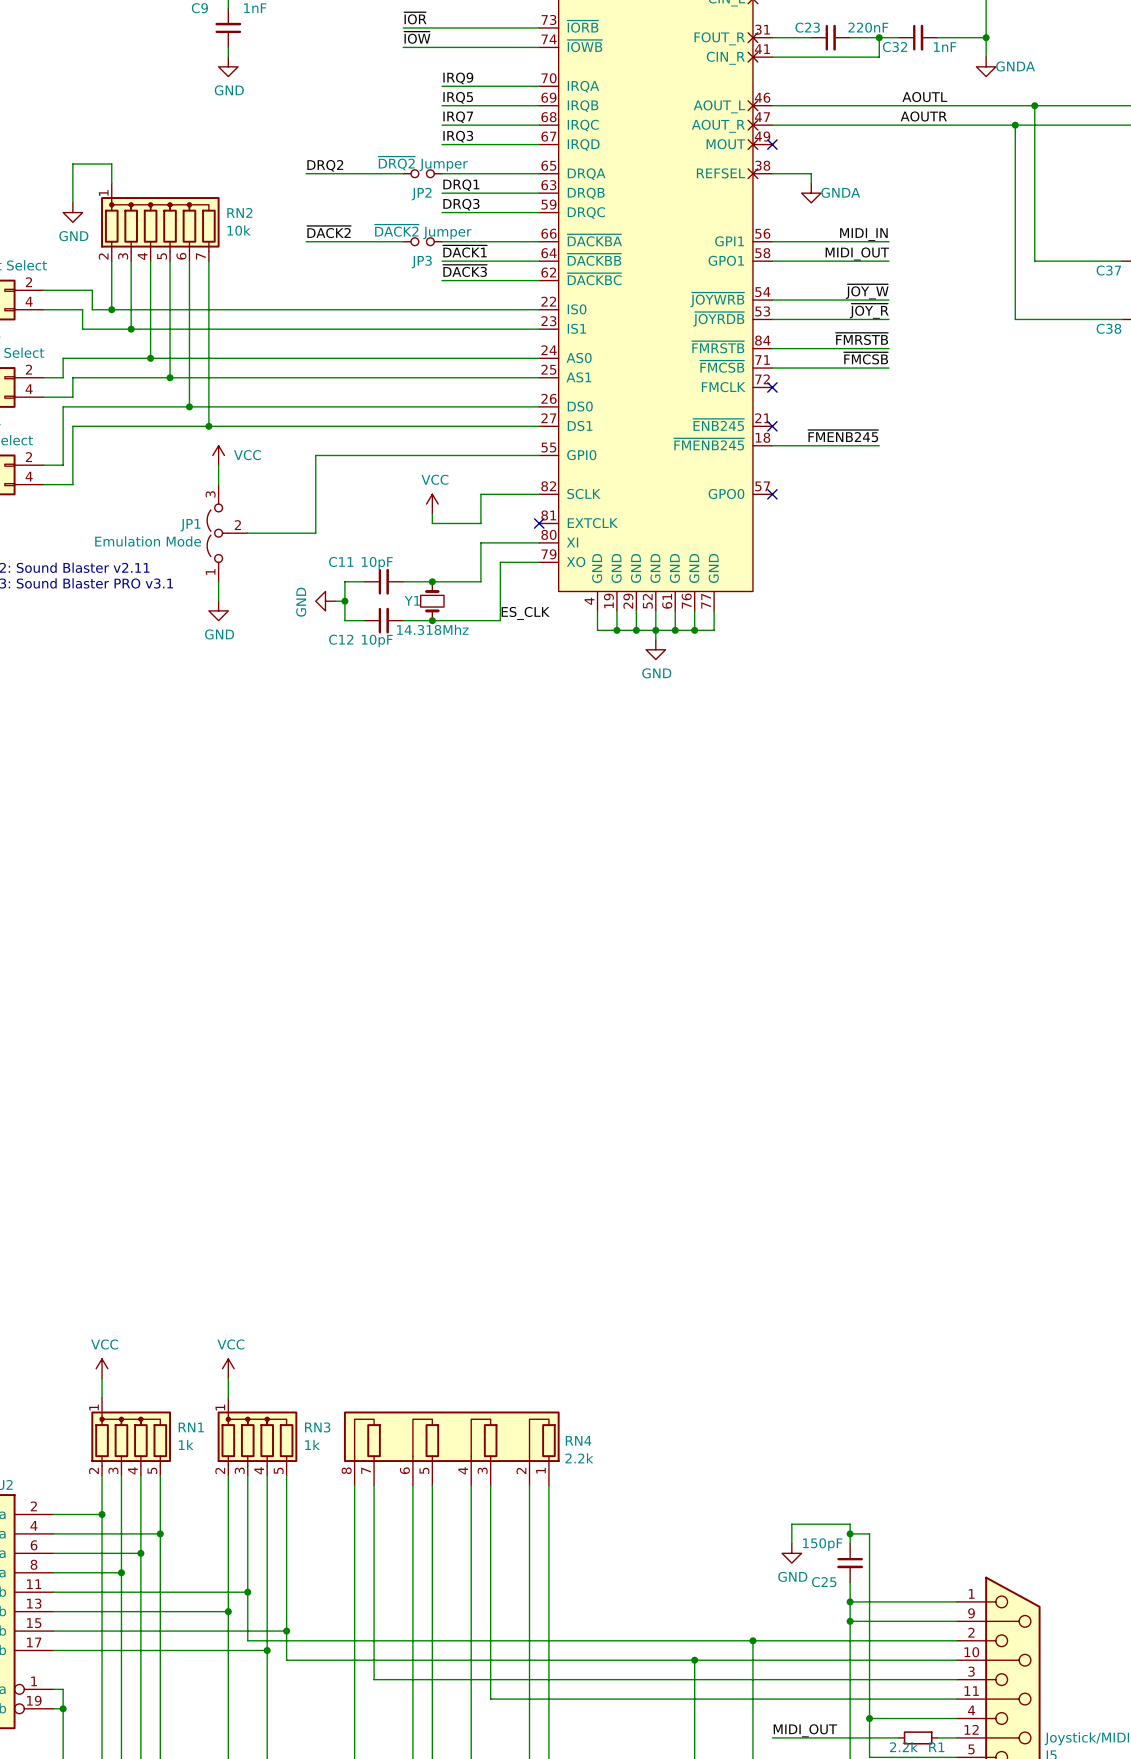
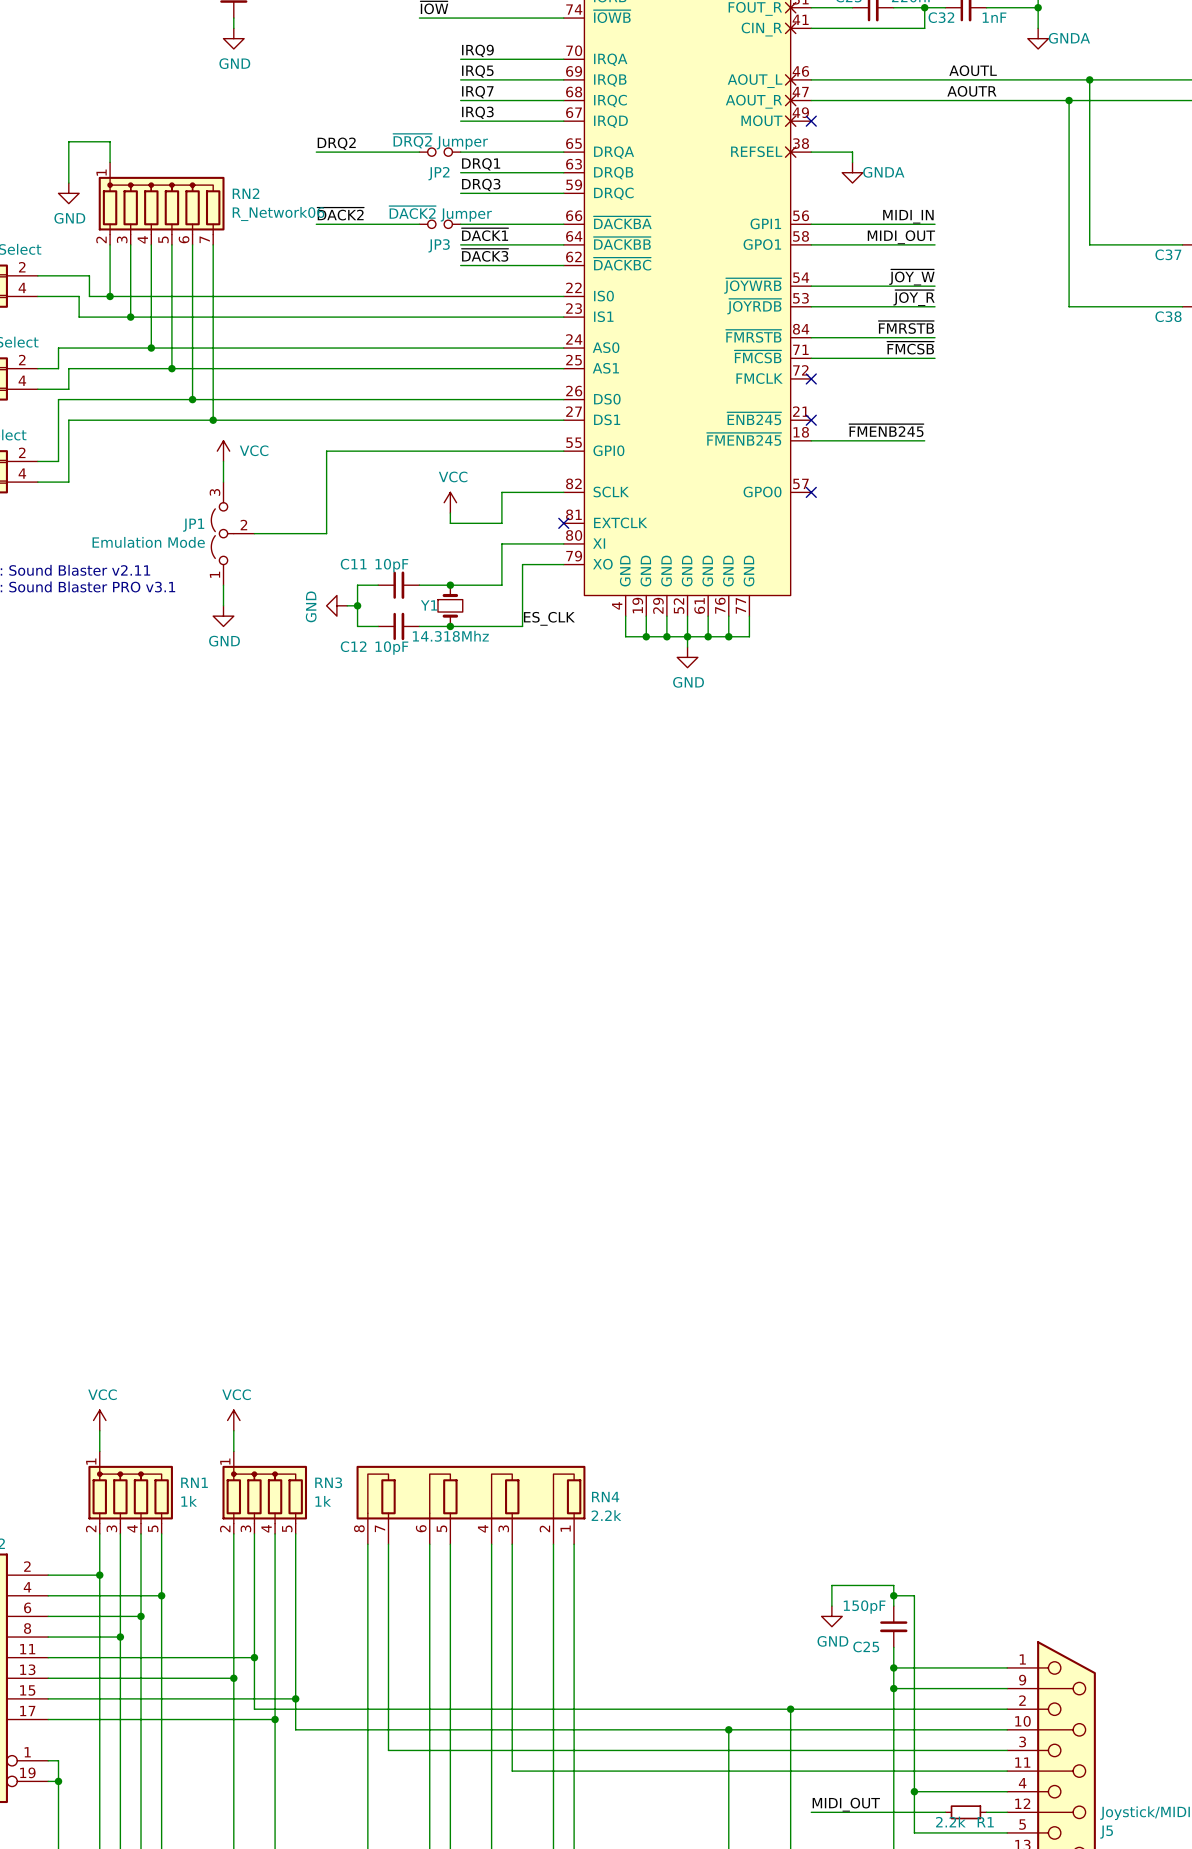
RN2 value: 10k (239, 230) -> R_Network06 (278, 214)

